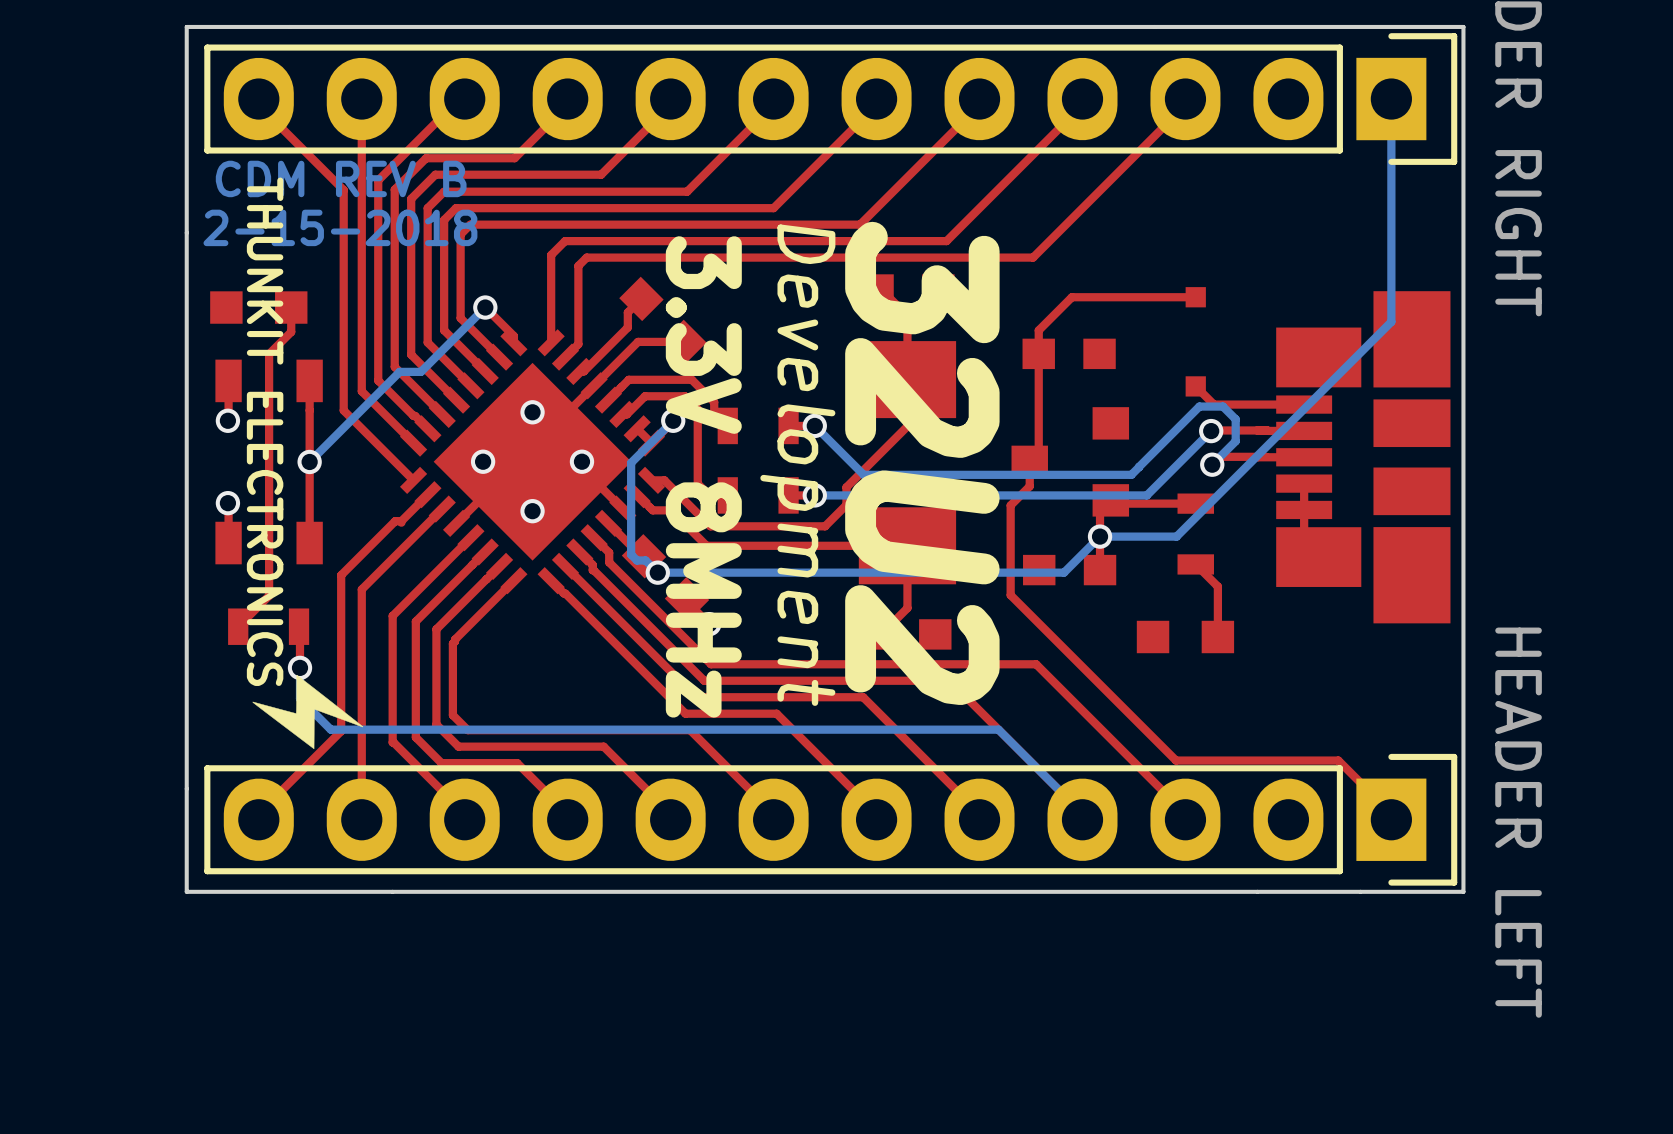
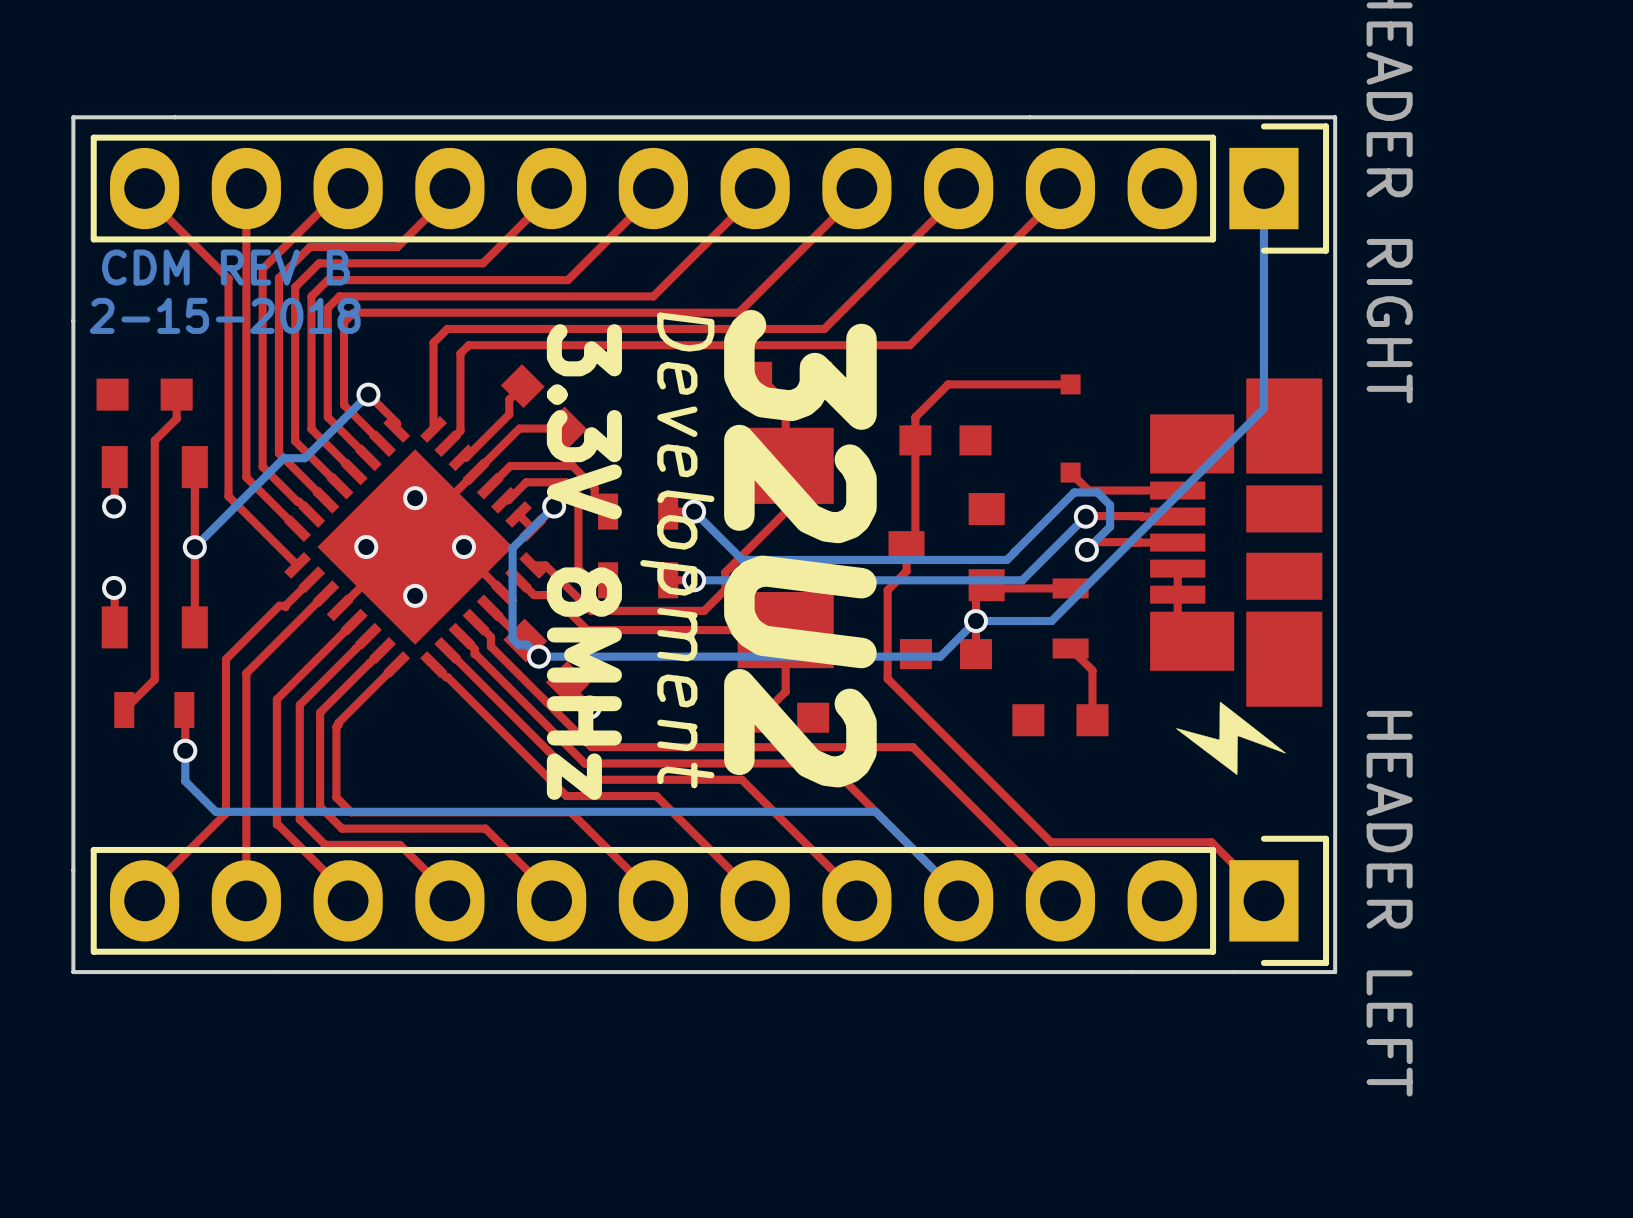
text: THUNKIT ELECTRONICS (265, 431) -> none
drawing: none -> [1176, 701, 1286, 776]
drawing: [252, 674, 364, 750] -> none

